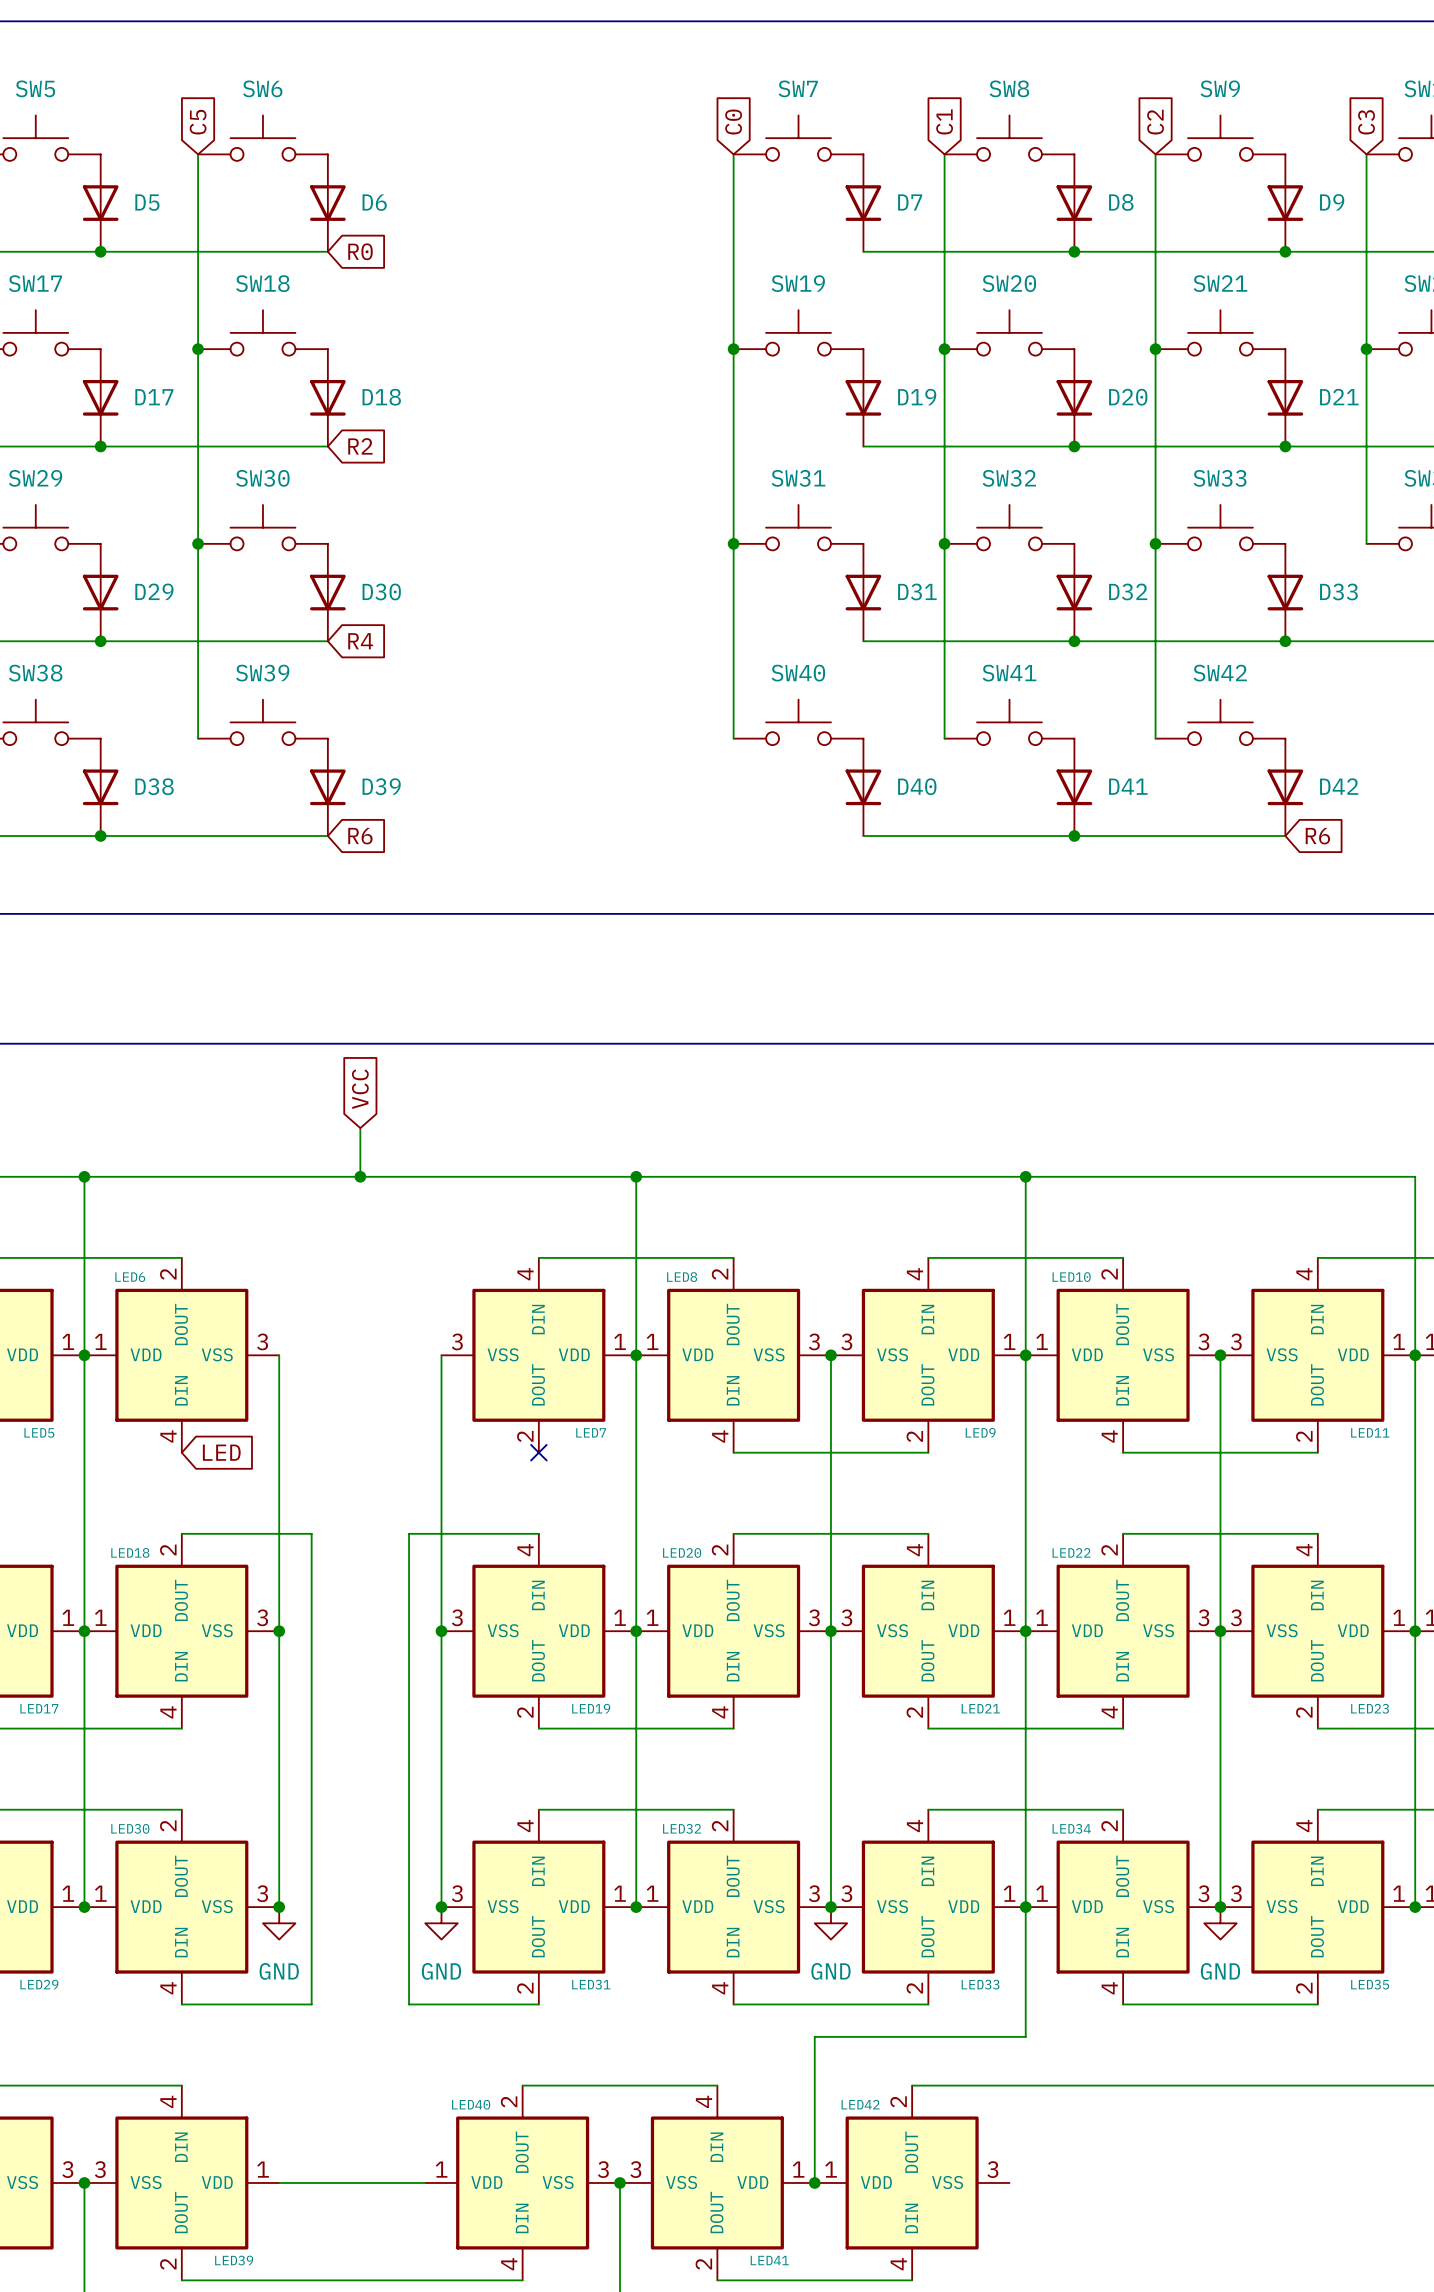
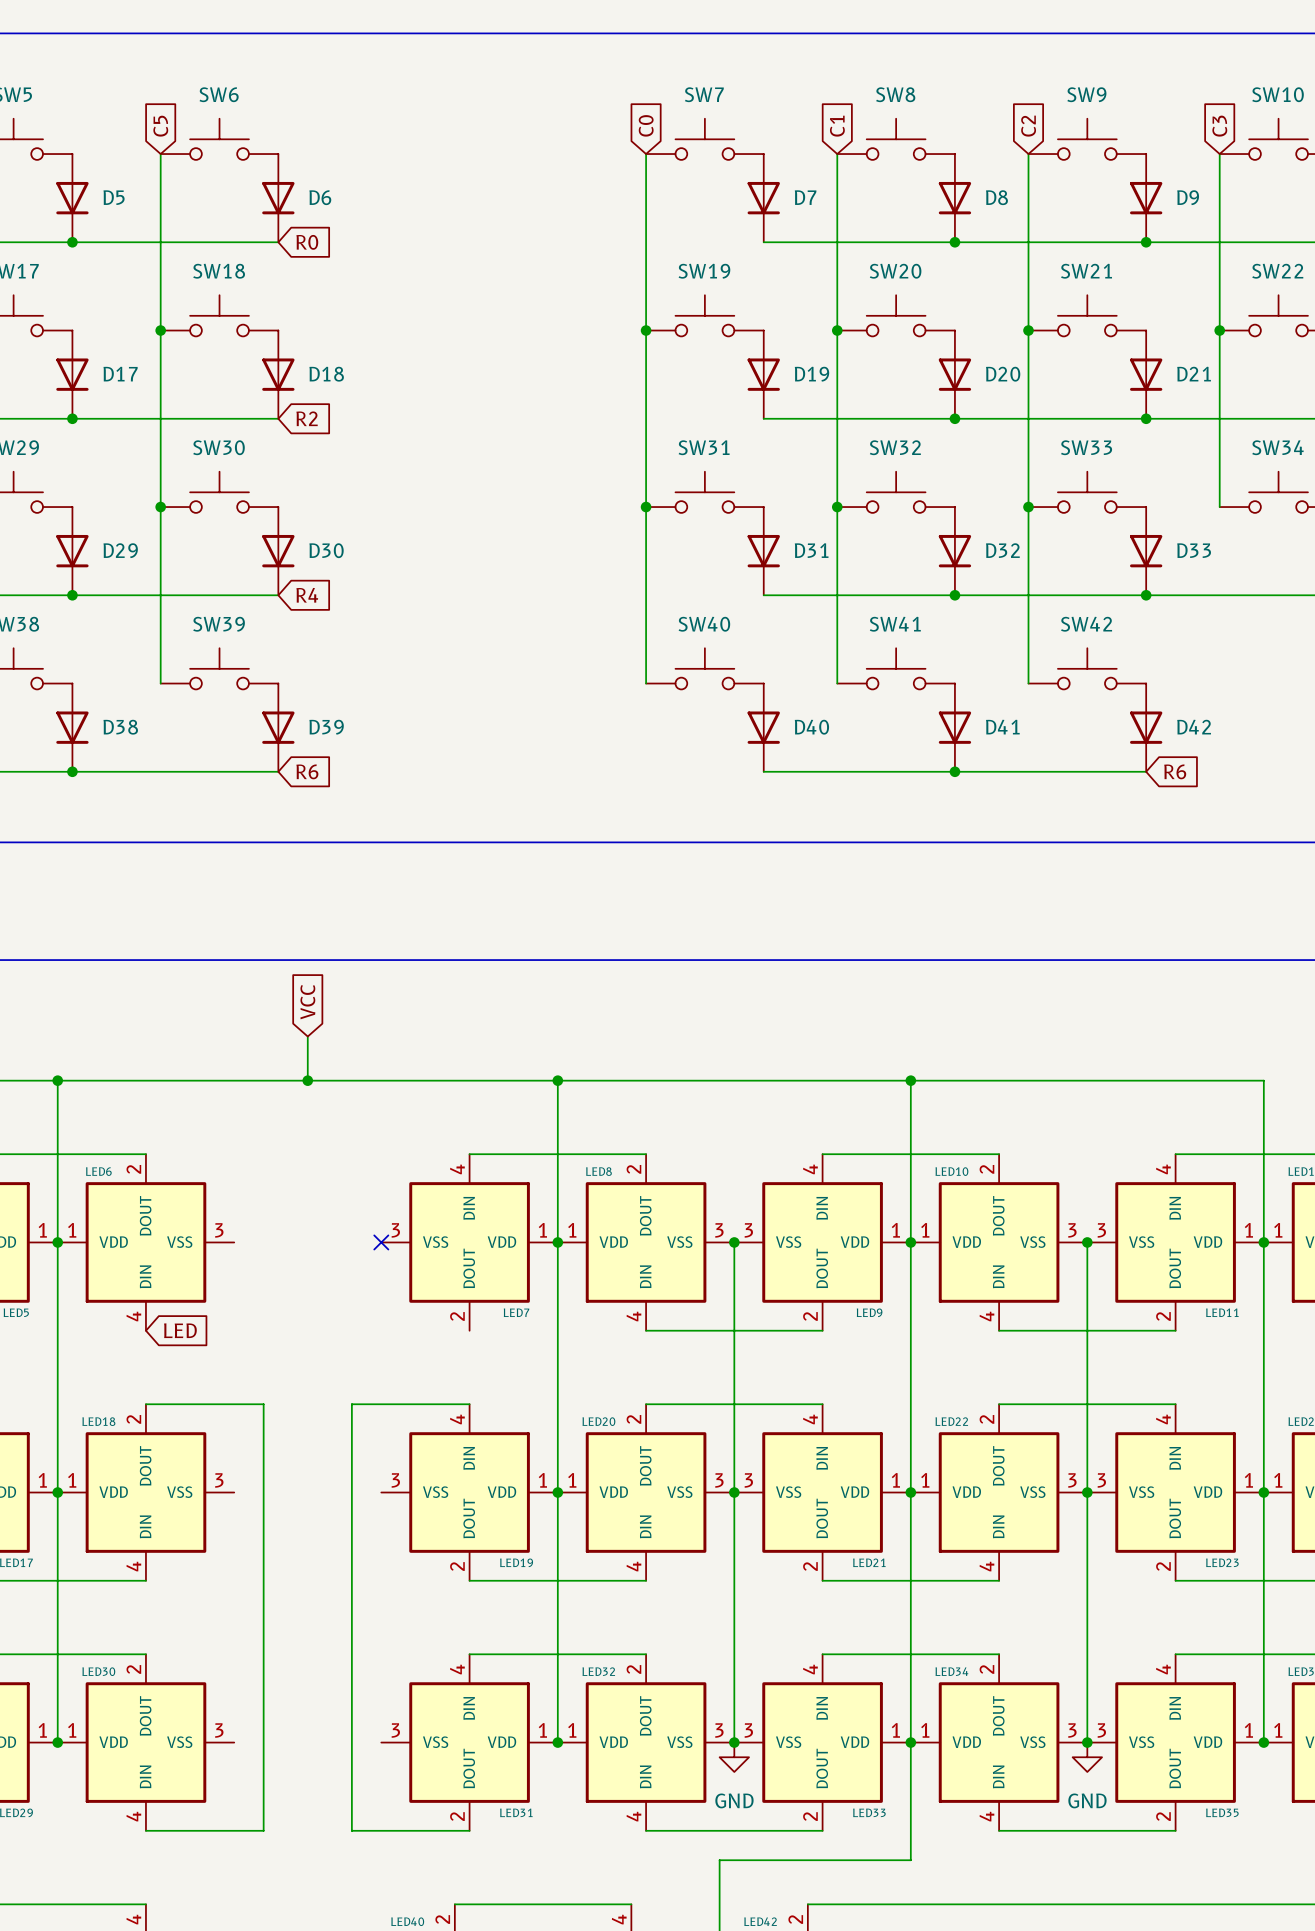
wire: (279, 1355) (279, 1907) -> none
wire: (441, 1355) (441, 1907) -> none
no-connect mark: none -> (381, 1242)
no-connect mark: (538, 1452) -> none
junction: (279, 1631) -> none
junction: (441, 1631) -> none
junction: (279, 1907) -> none
junction: (441, 1907) -> none
power symbol: GND (279, 1923) -> none
power symbol: GND (441, 1923) -> none

